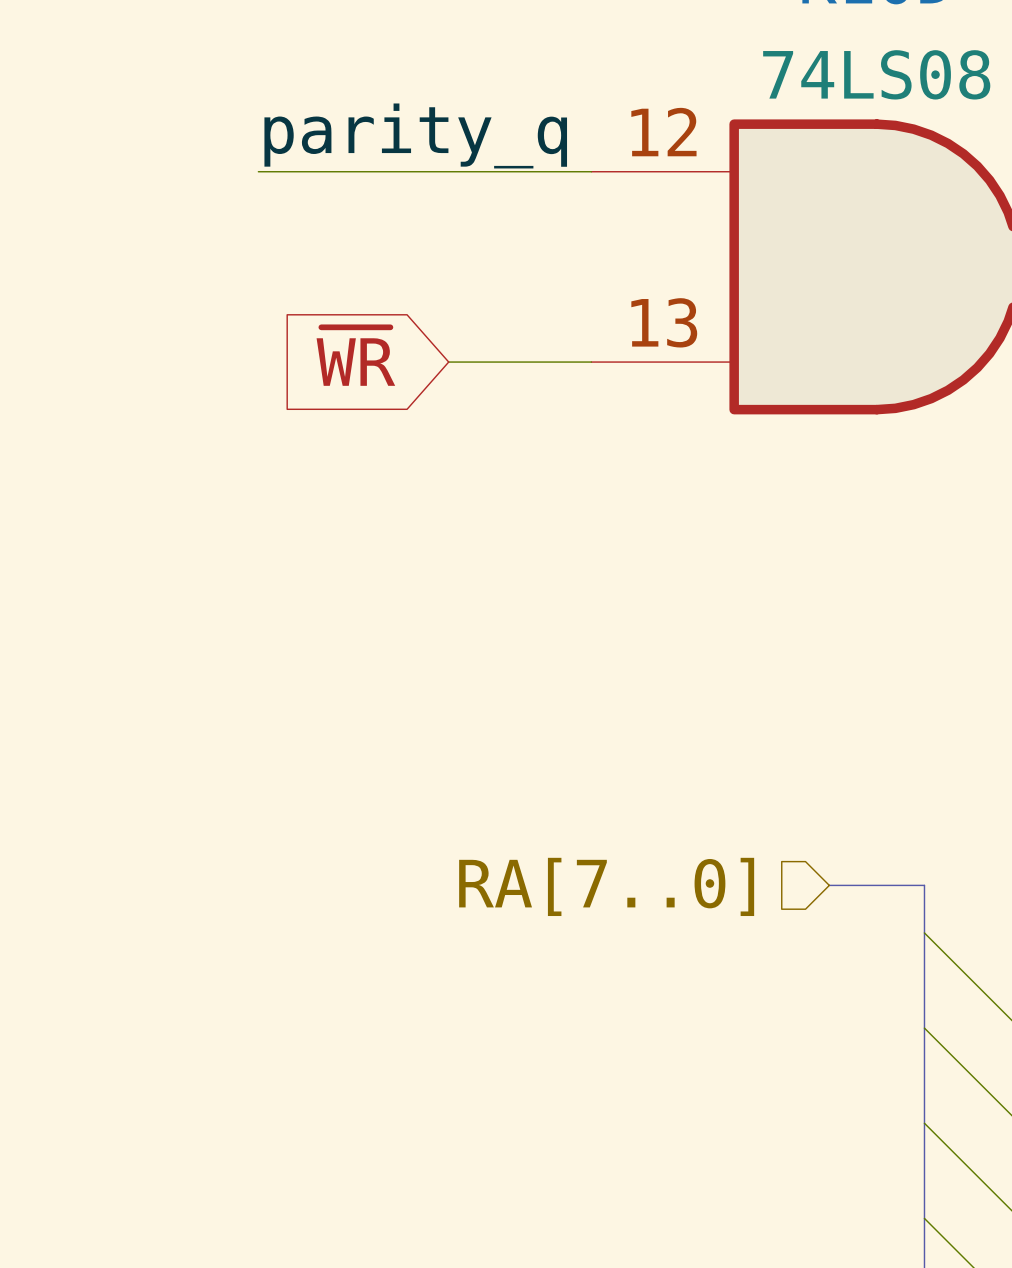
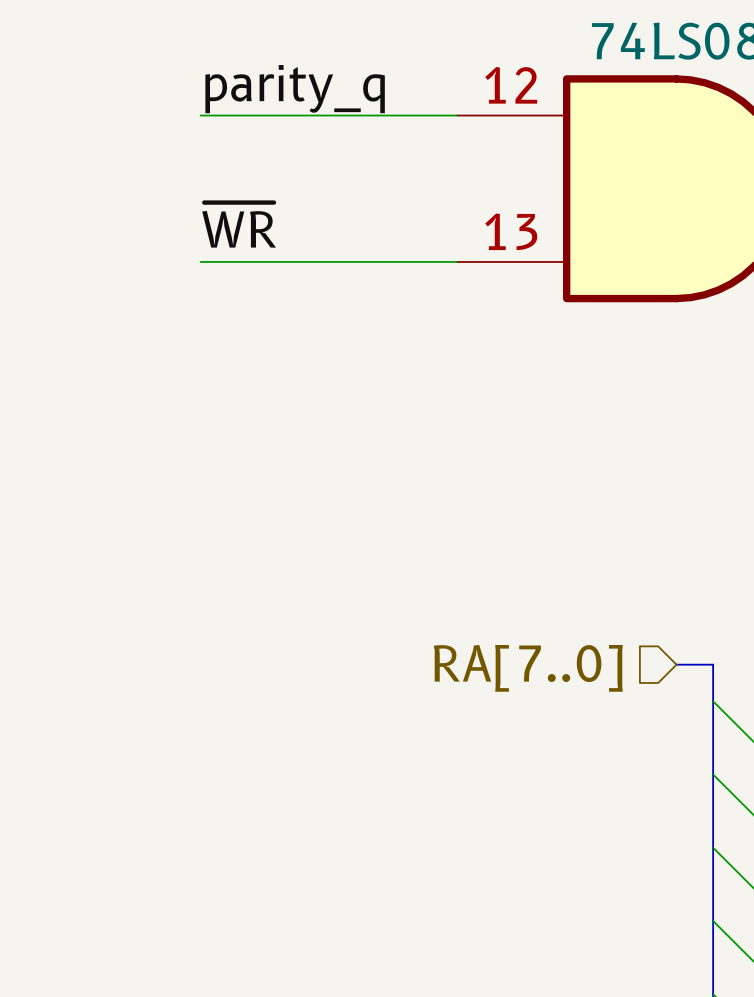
label: none -> ~{WR} (239, 225)
global label: ~{WR} (355, 356) -> none
wire: none -> (200, 261) (347, 261)
bus: (829, 885) (876, 885) -> none
hierarchical label position: RA[7..0] (606, 886) -> RA[7..0] (528, 668)

